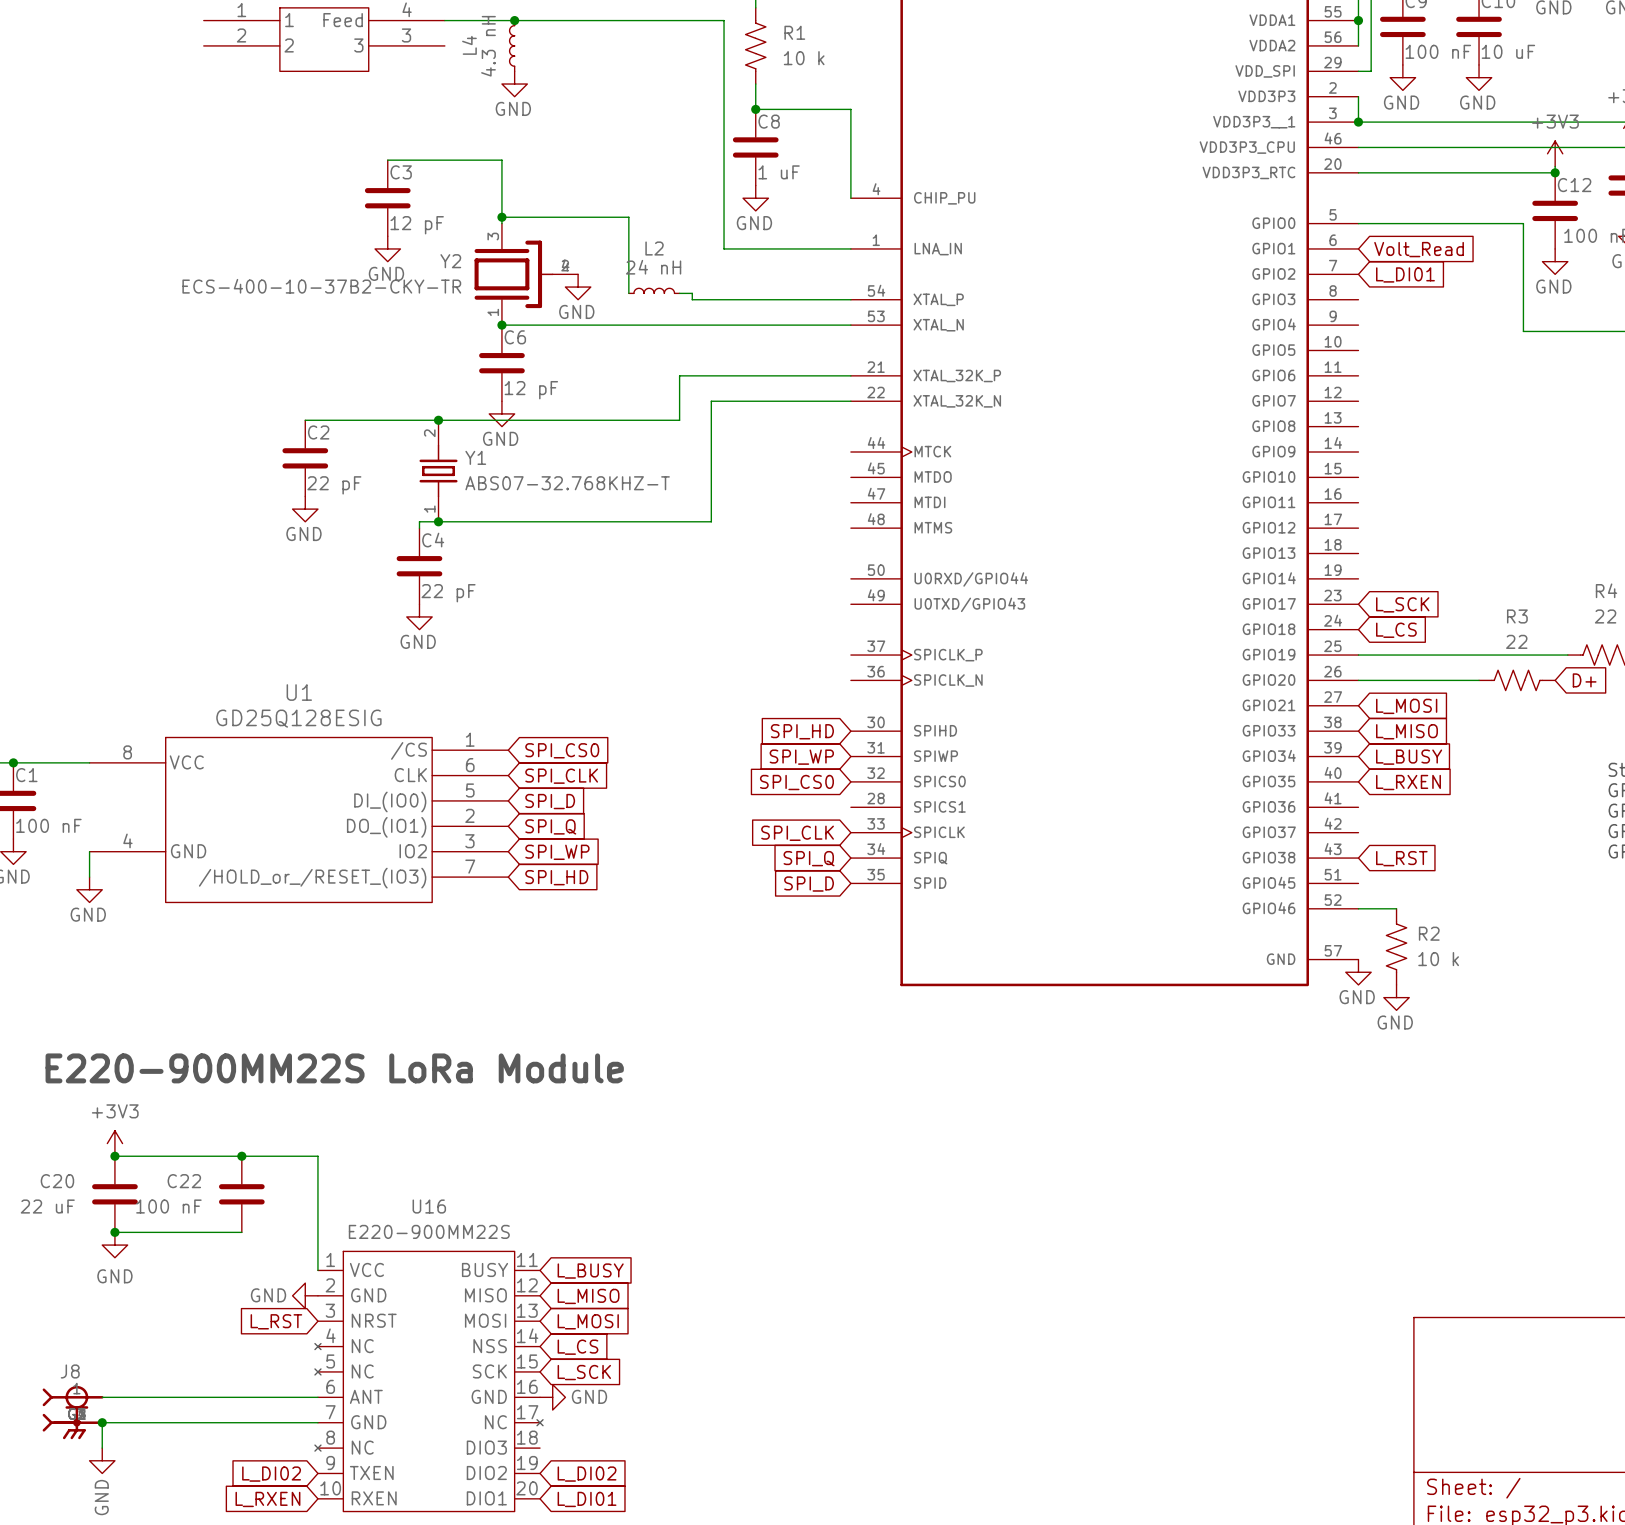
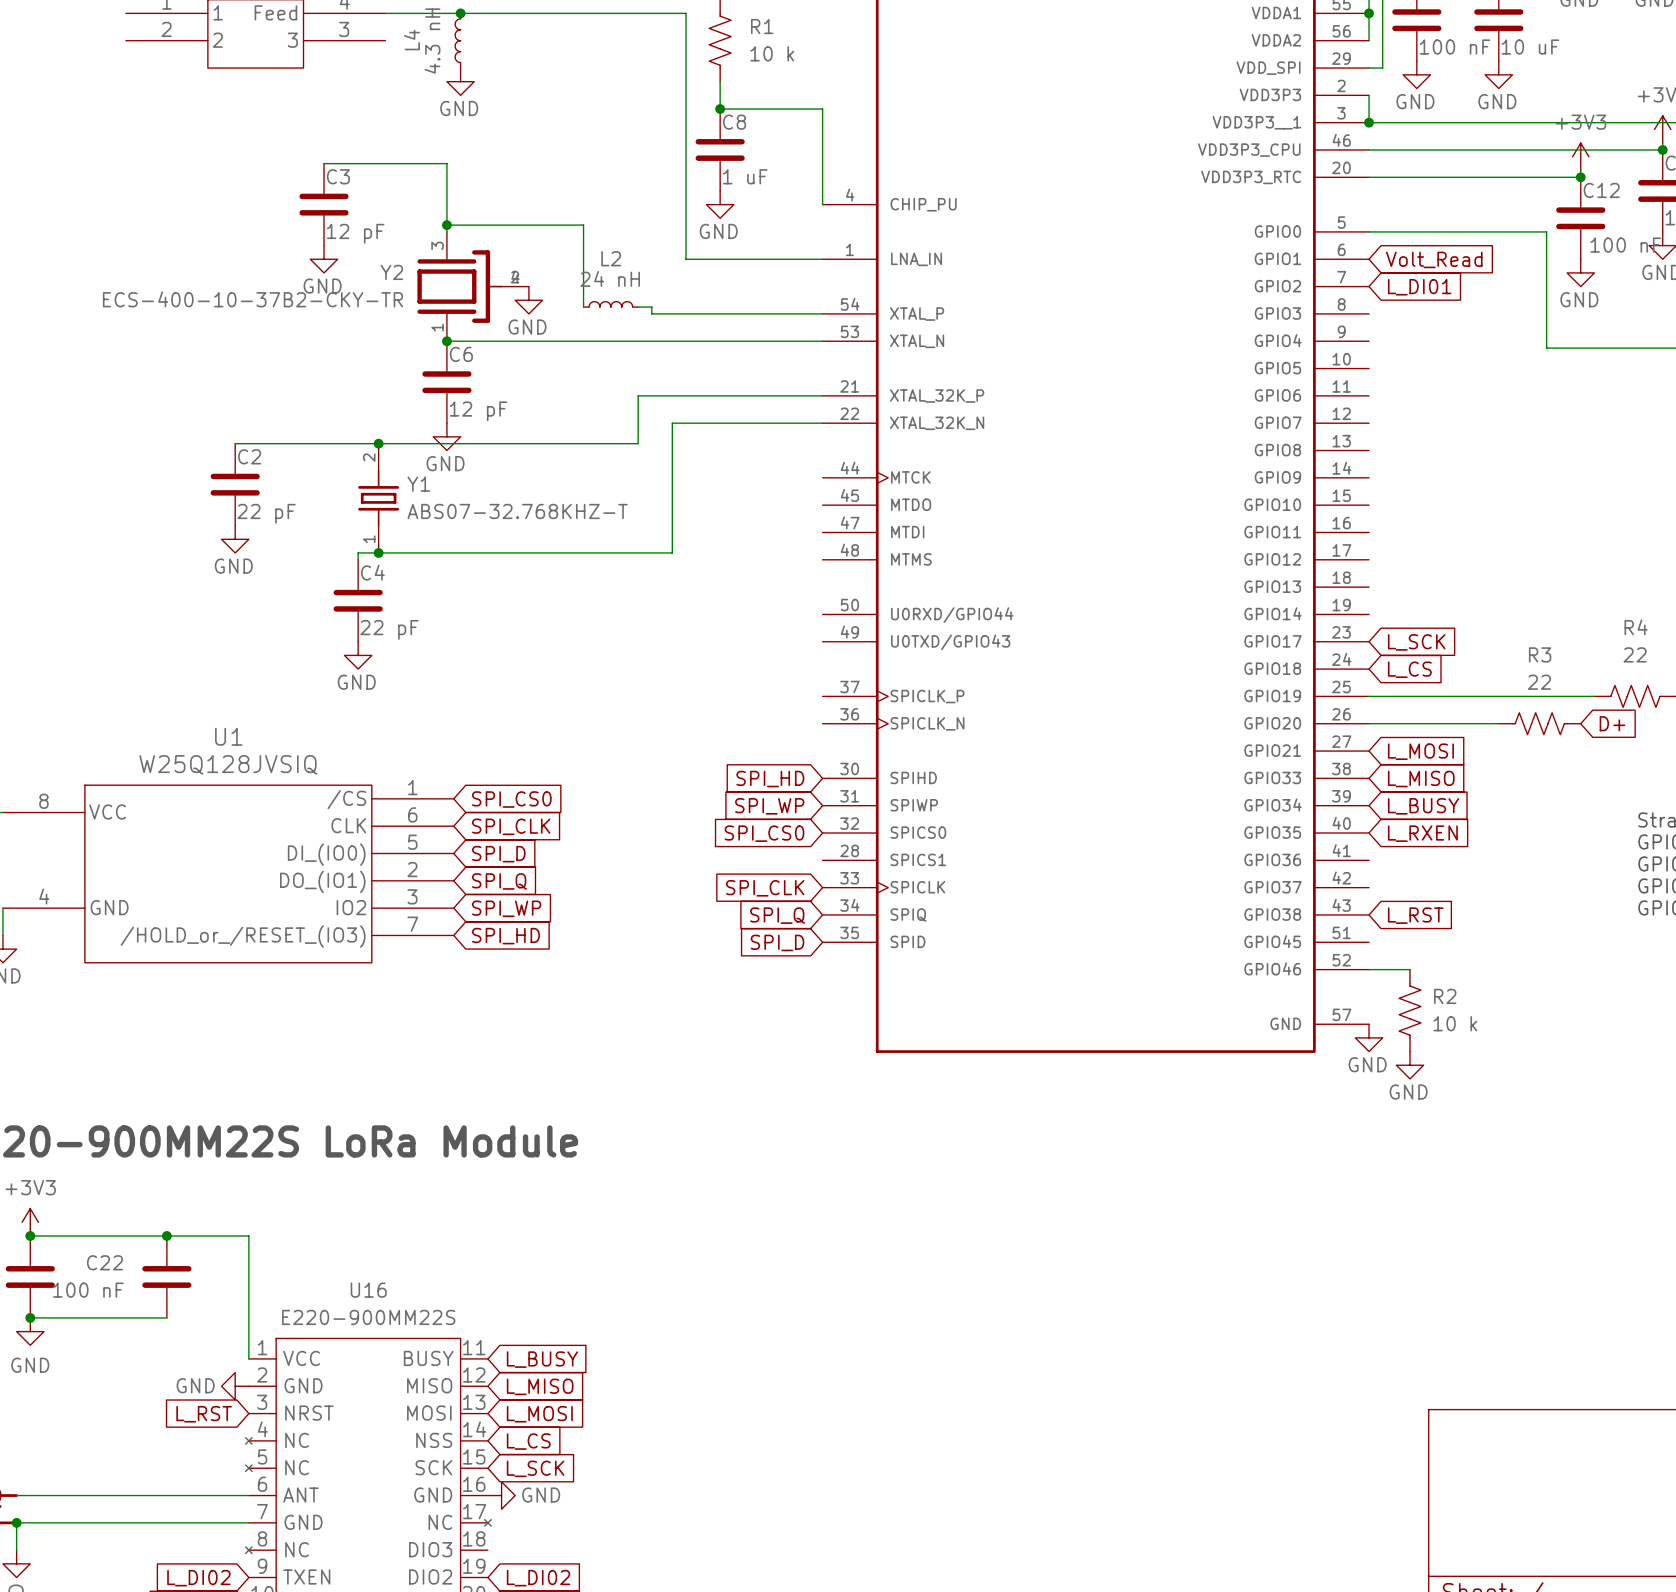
U1 value: GD25Q128ESIG (298, 718) -> W25Q128JVSIQ (228, 764)

